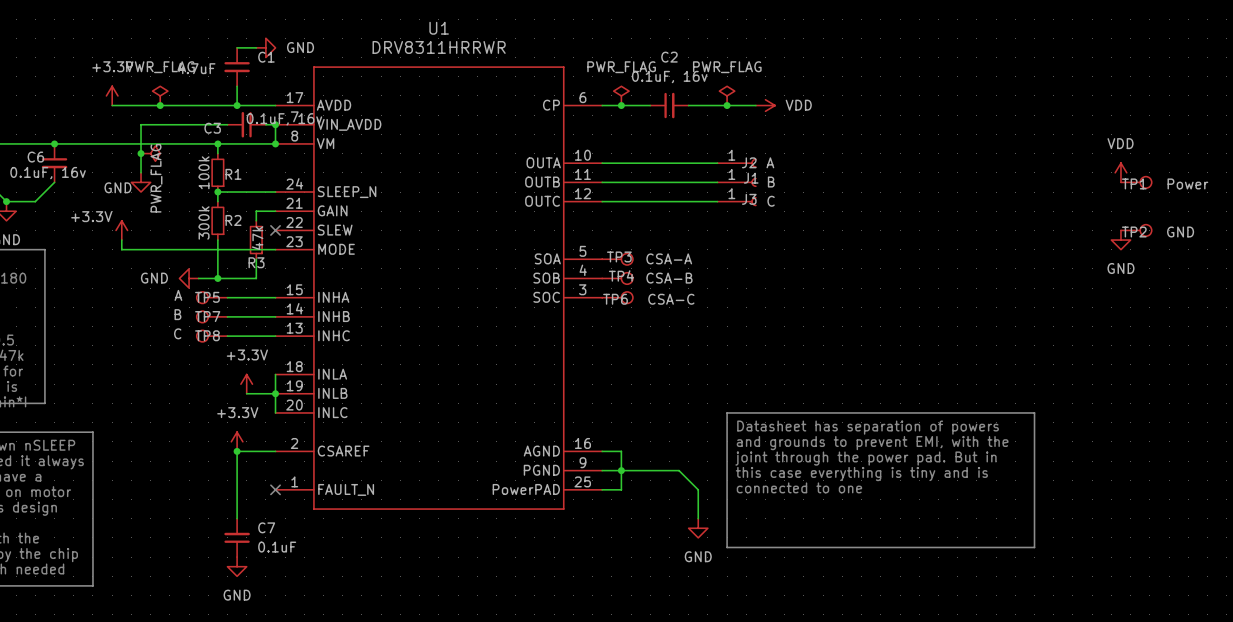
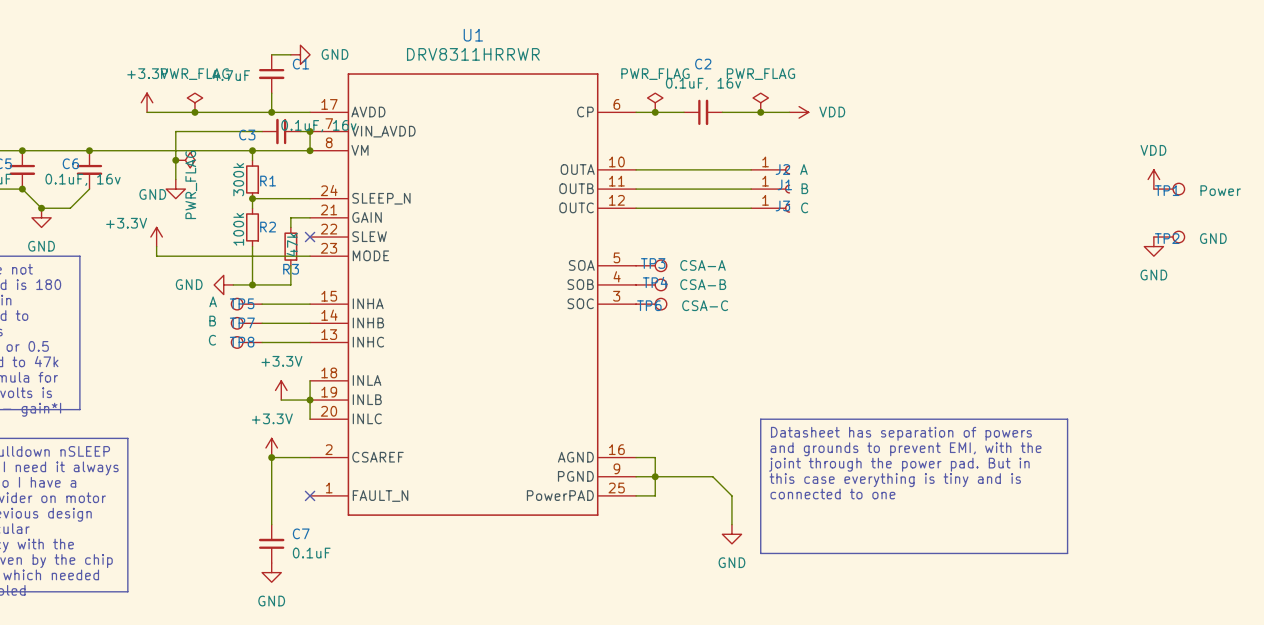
R1 value: 100k (204, 172) -> 300k (238, 179)
R2 value: 300k (204, 222) -> 100k (238, 229)

